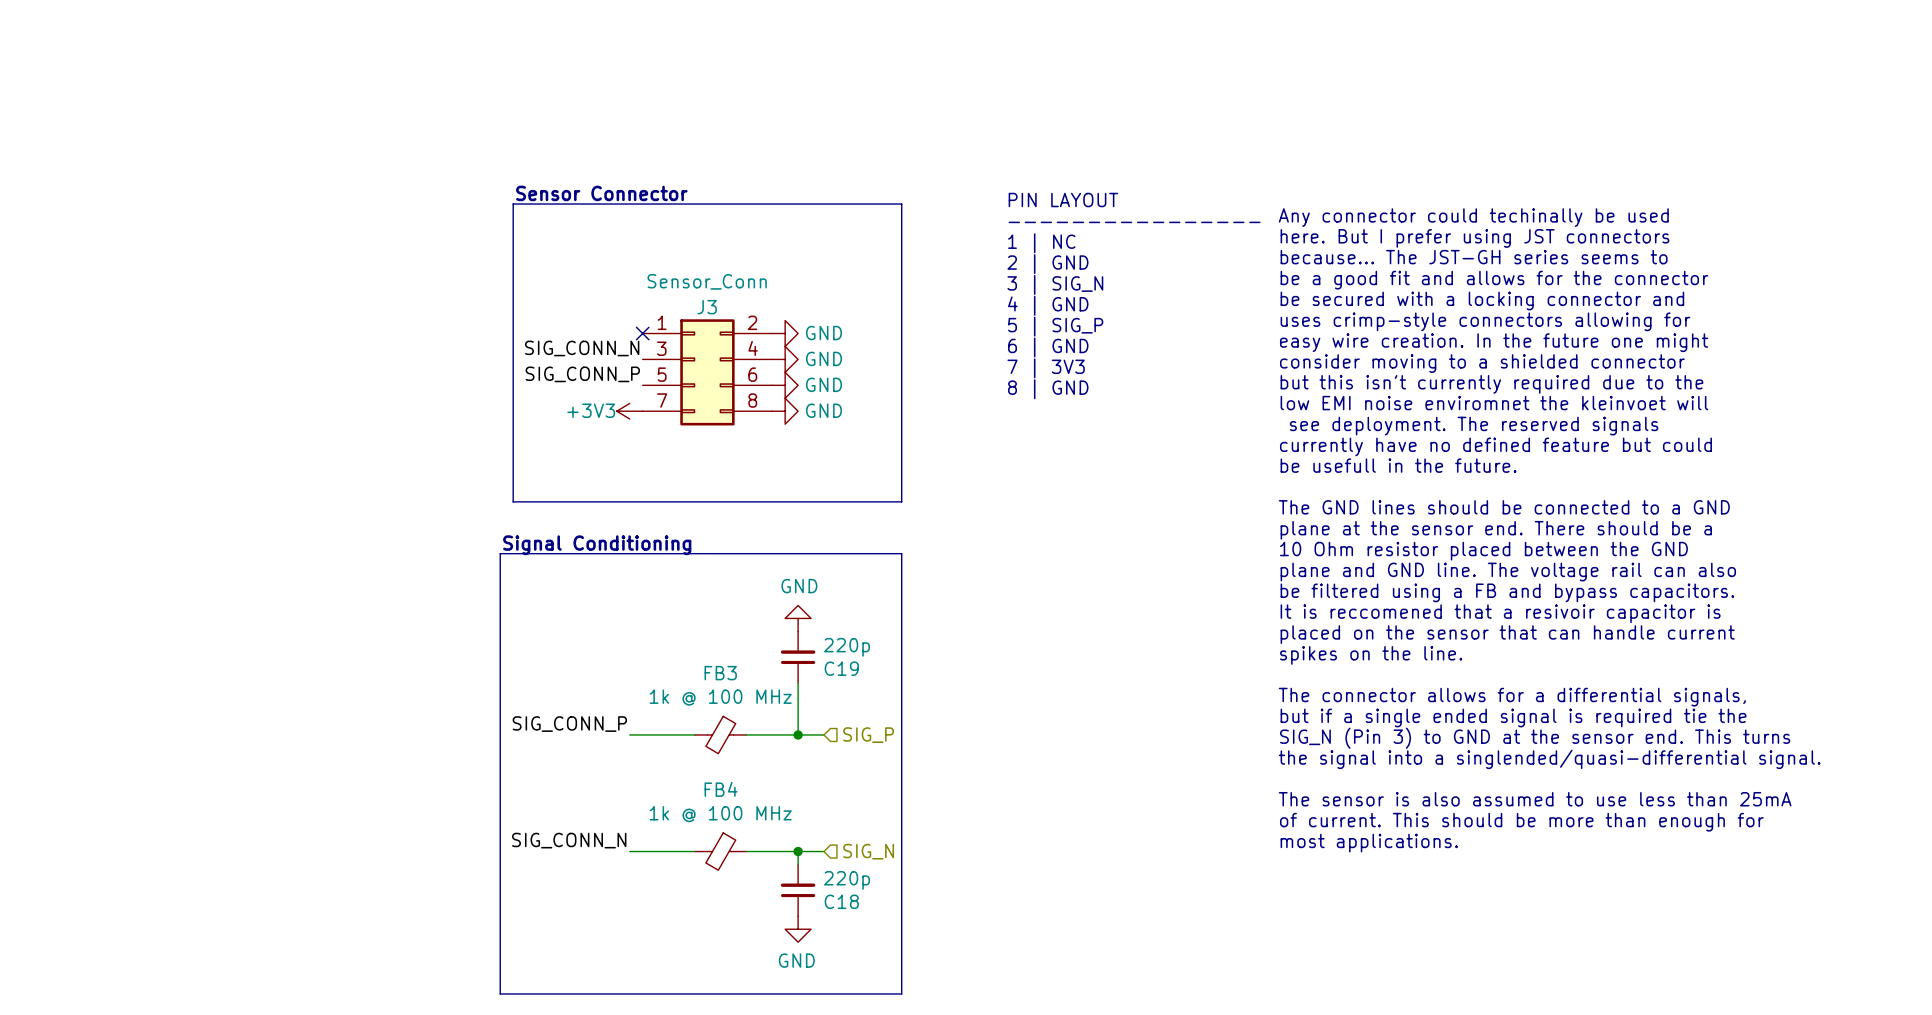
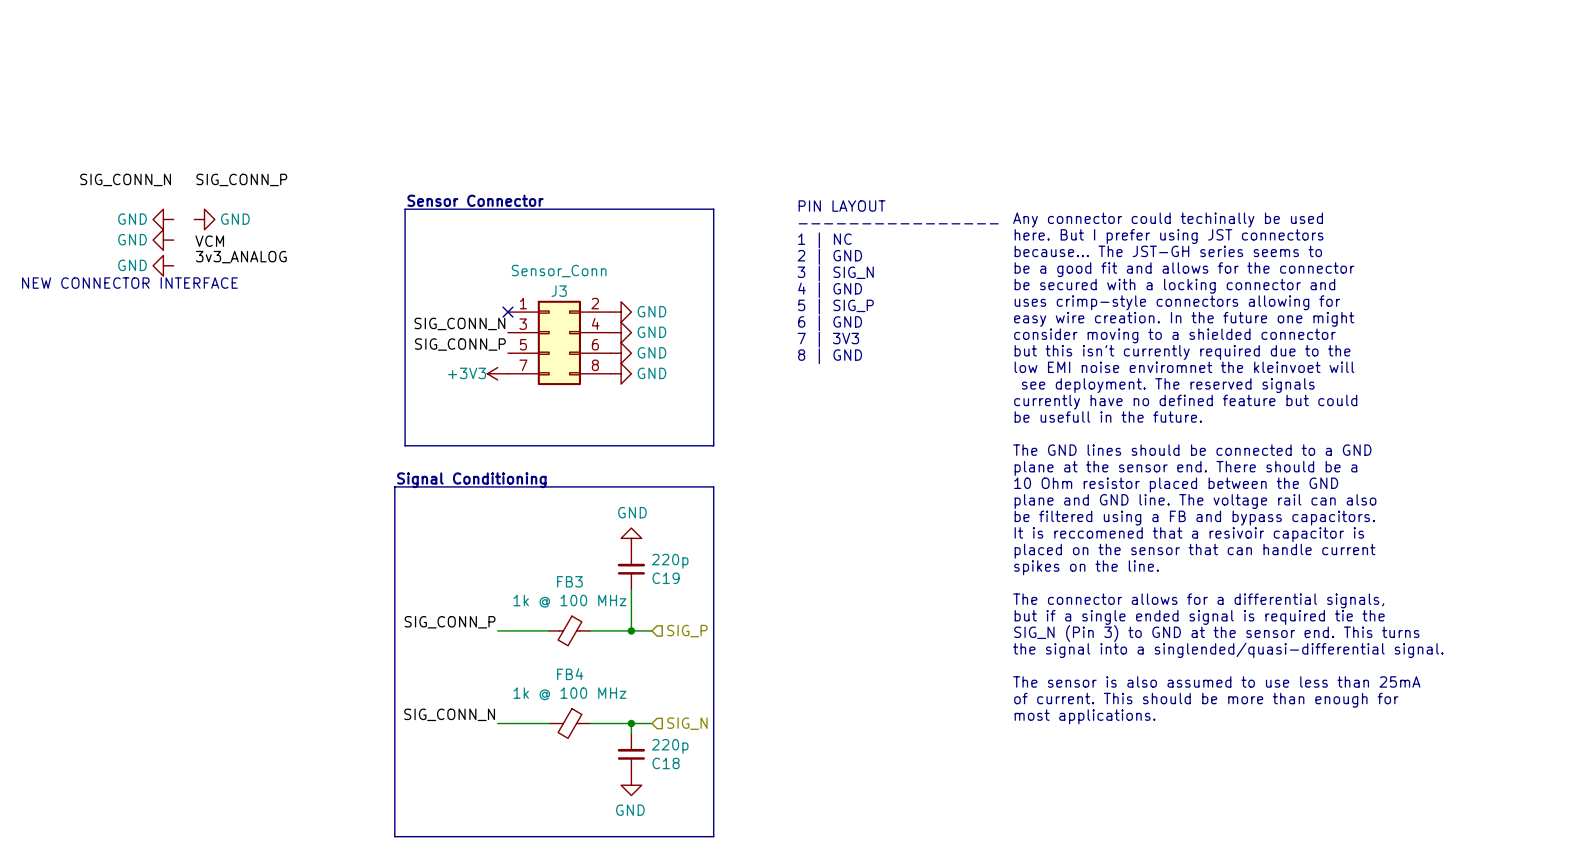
label: none -> SIG_CONN_N (125, 179)
label: none -> SIG_CONN_P (241, 179)
power symbol: none -> GND (163, 219)
power symbol: none -> GND (204, 219)
power symbol: none -> GND (163, 240)
label: none -> VCM (209, 241)
label: none -> 3v3_ANALOG (241, 257)
power symbol: none -> GND (163, 265)
text: none -> NEW CONNECTOR INTERFACE (129, 283)

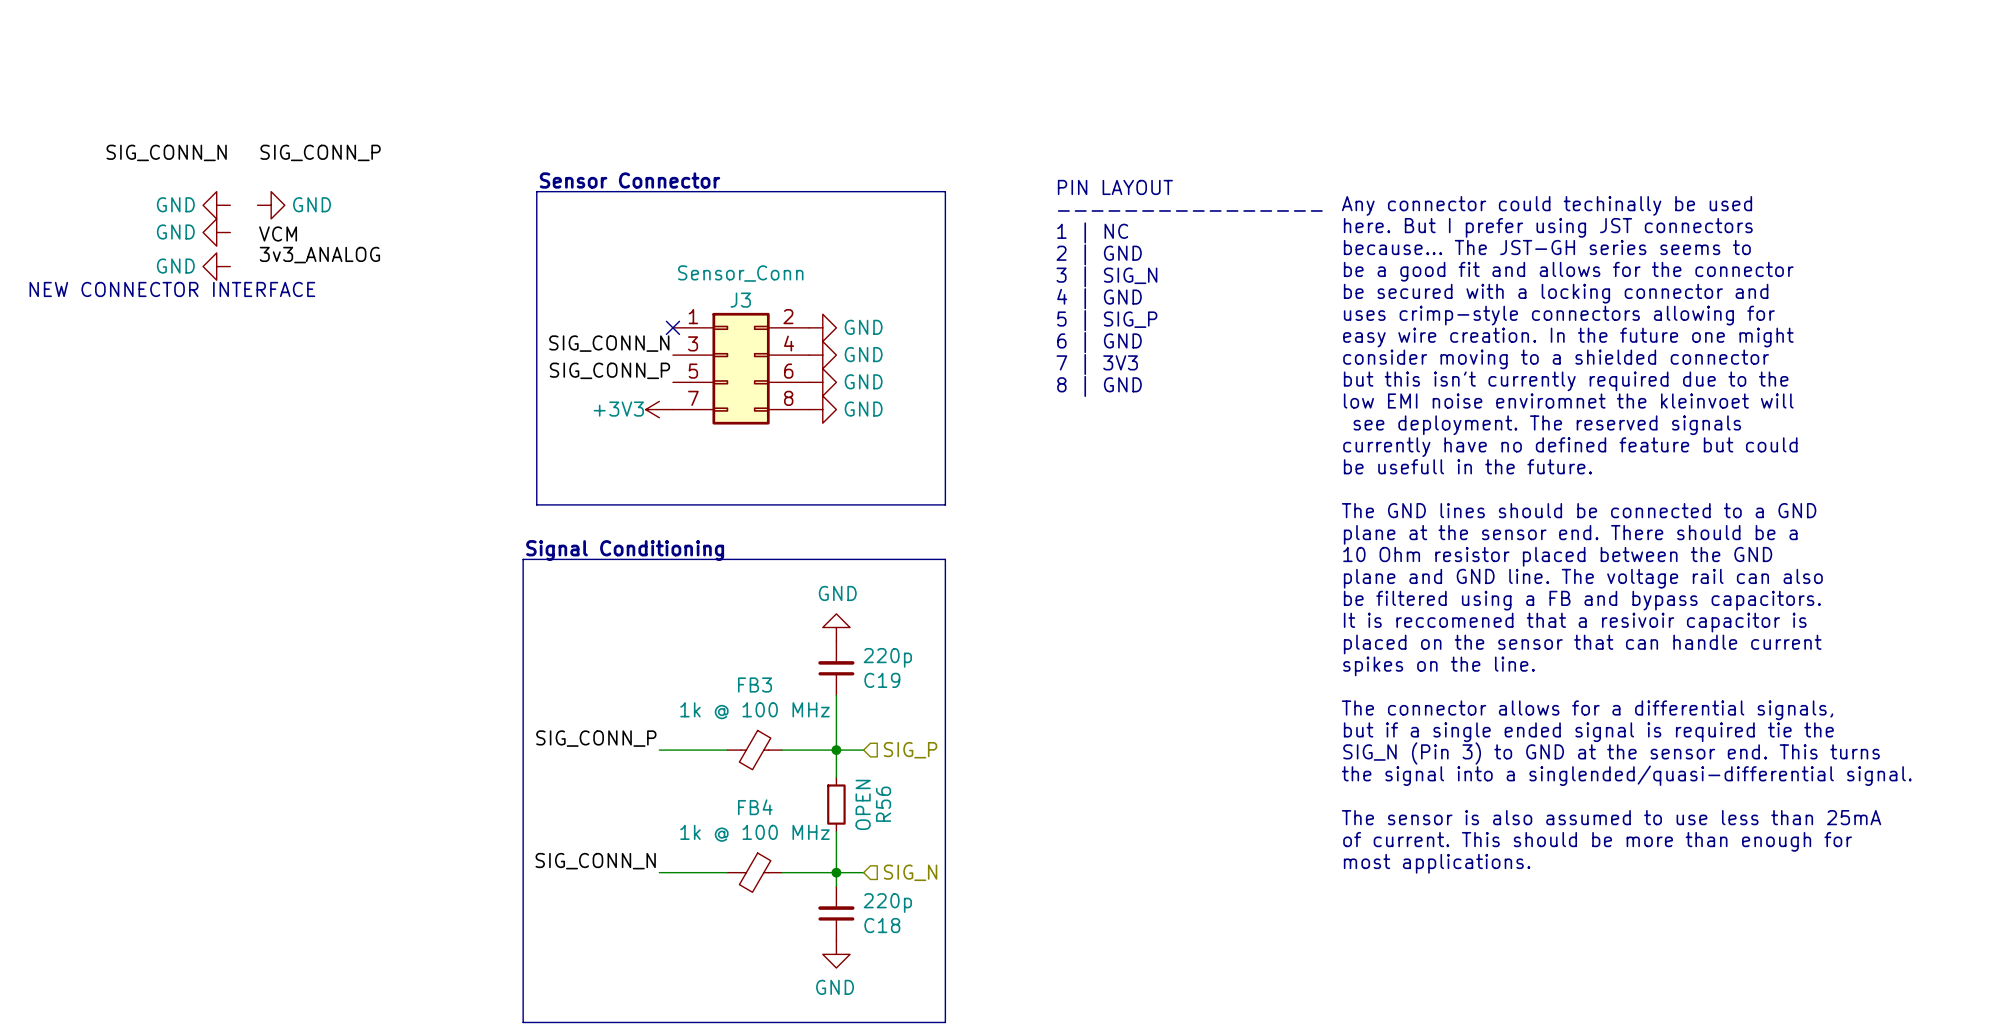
wire: none -> (836, 750) (836, 777)
R56: none -> OPEN (836, 804)
wire: none -> (836, 831) (836, 872)

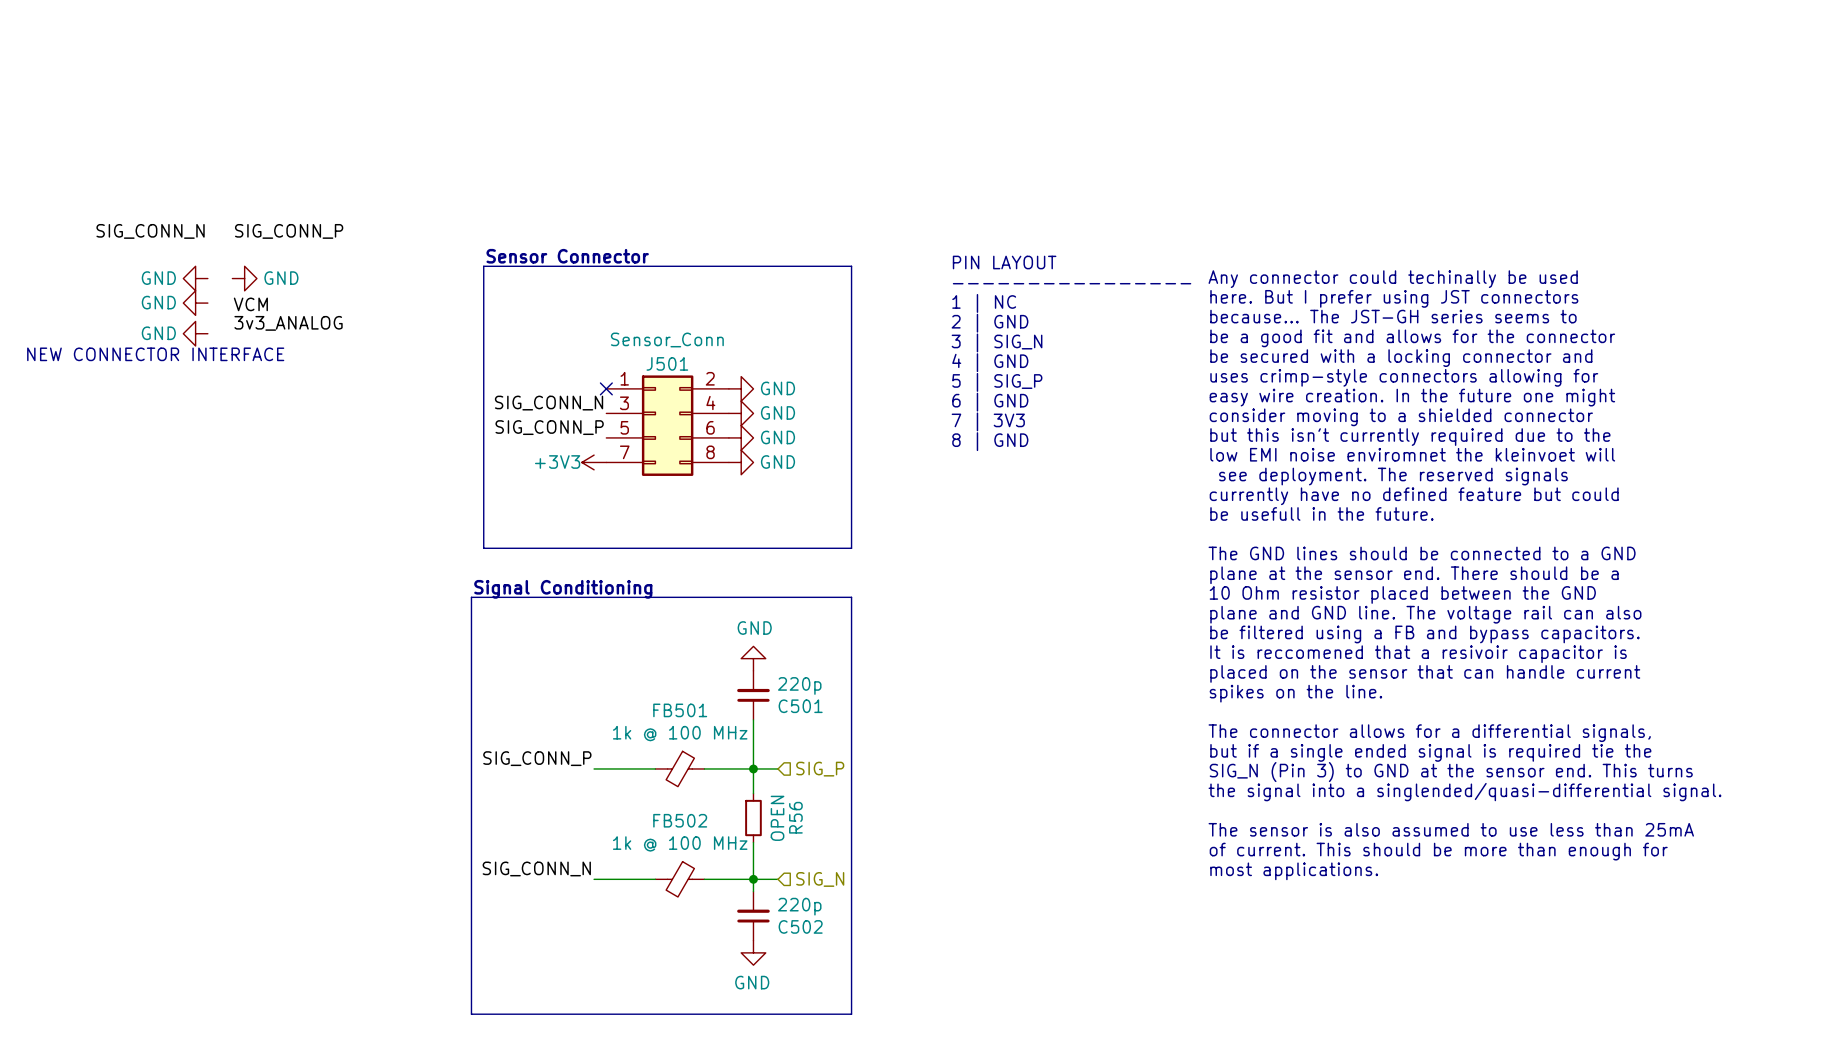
J3 name: J3 (740, 300) -> J501 (667, 363)
C19 name: C19 (882, 680) -> C501 (800, 706)
FB3 name: FB3 (755, 685) -> FB501 (680, 710)
FB4 name: FB4 (755, 807) -> FB502 (680, 820)
C18 name: C18 (882, 925) -> C502 (800, 926)

